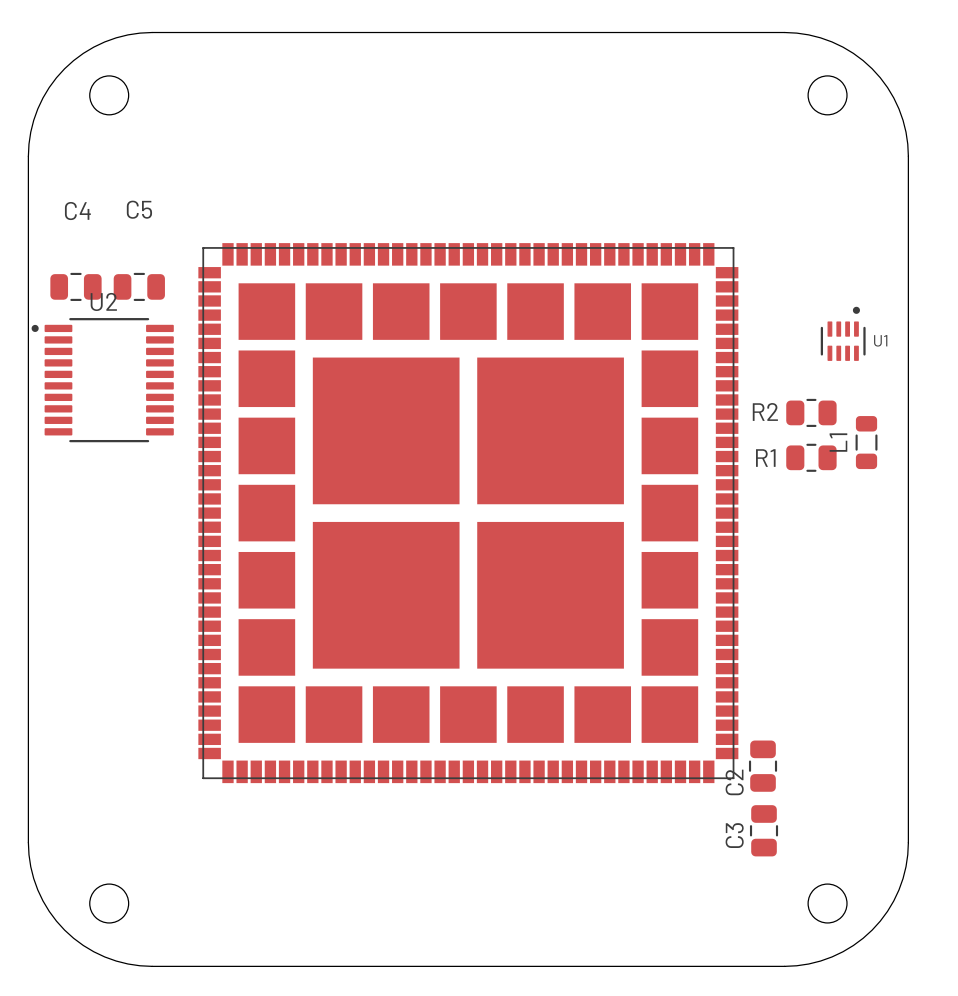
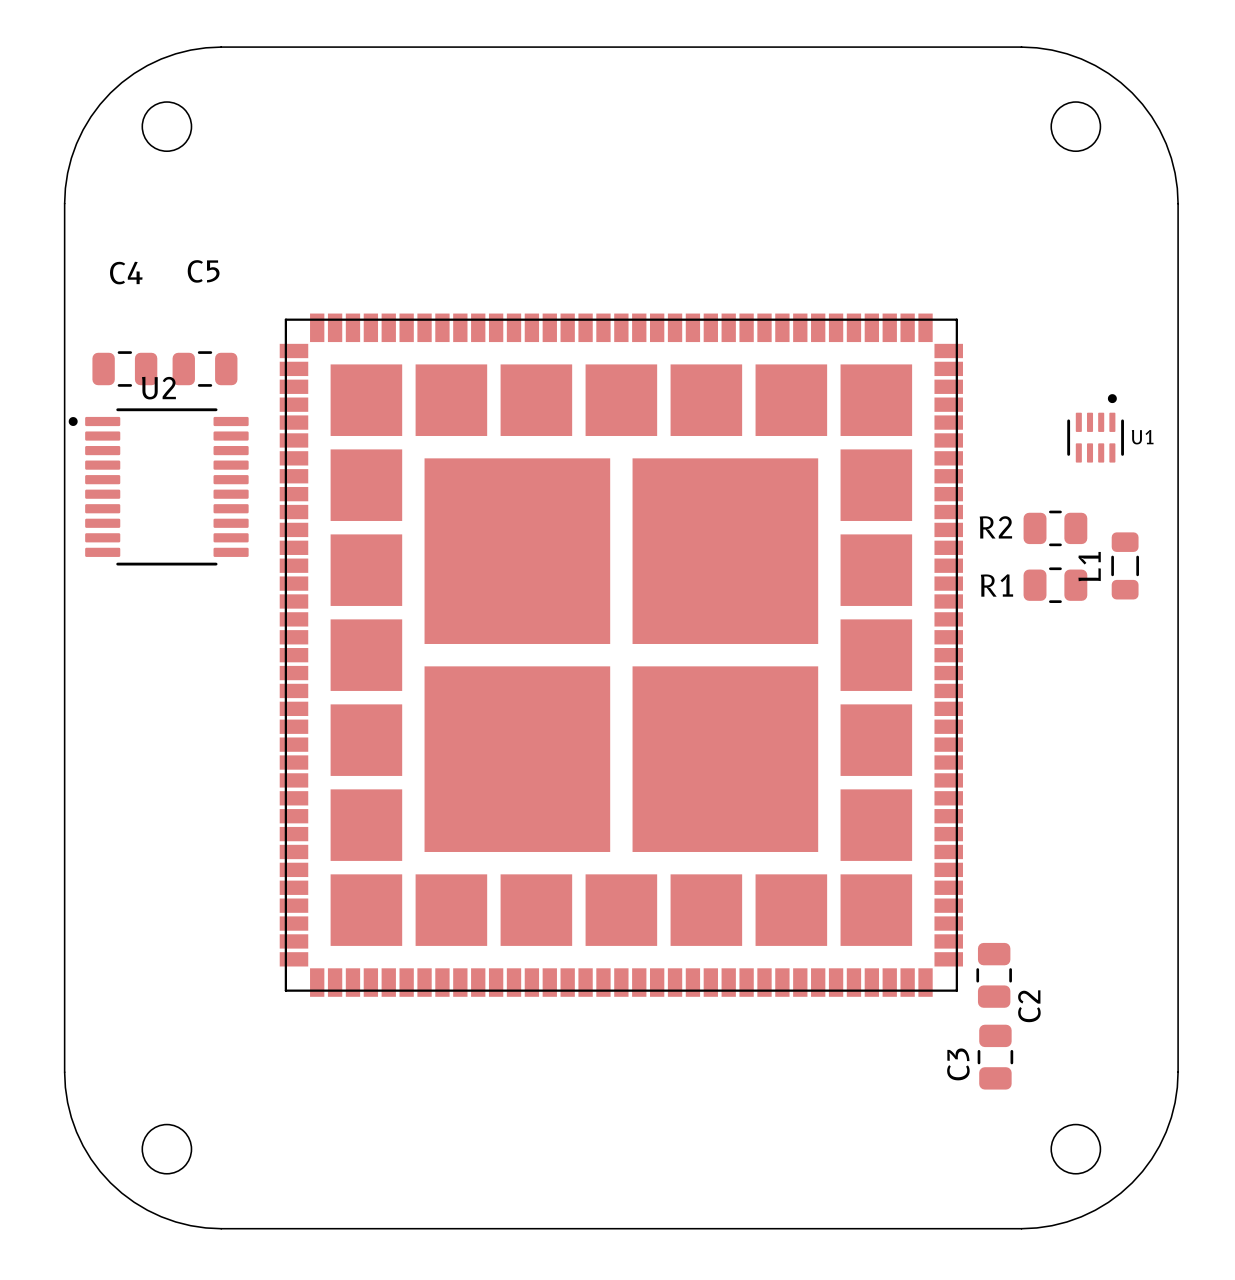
C2 name position: C2 (734, 782) -> C2 (1029, 1006)

